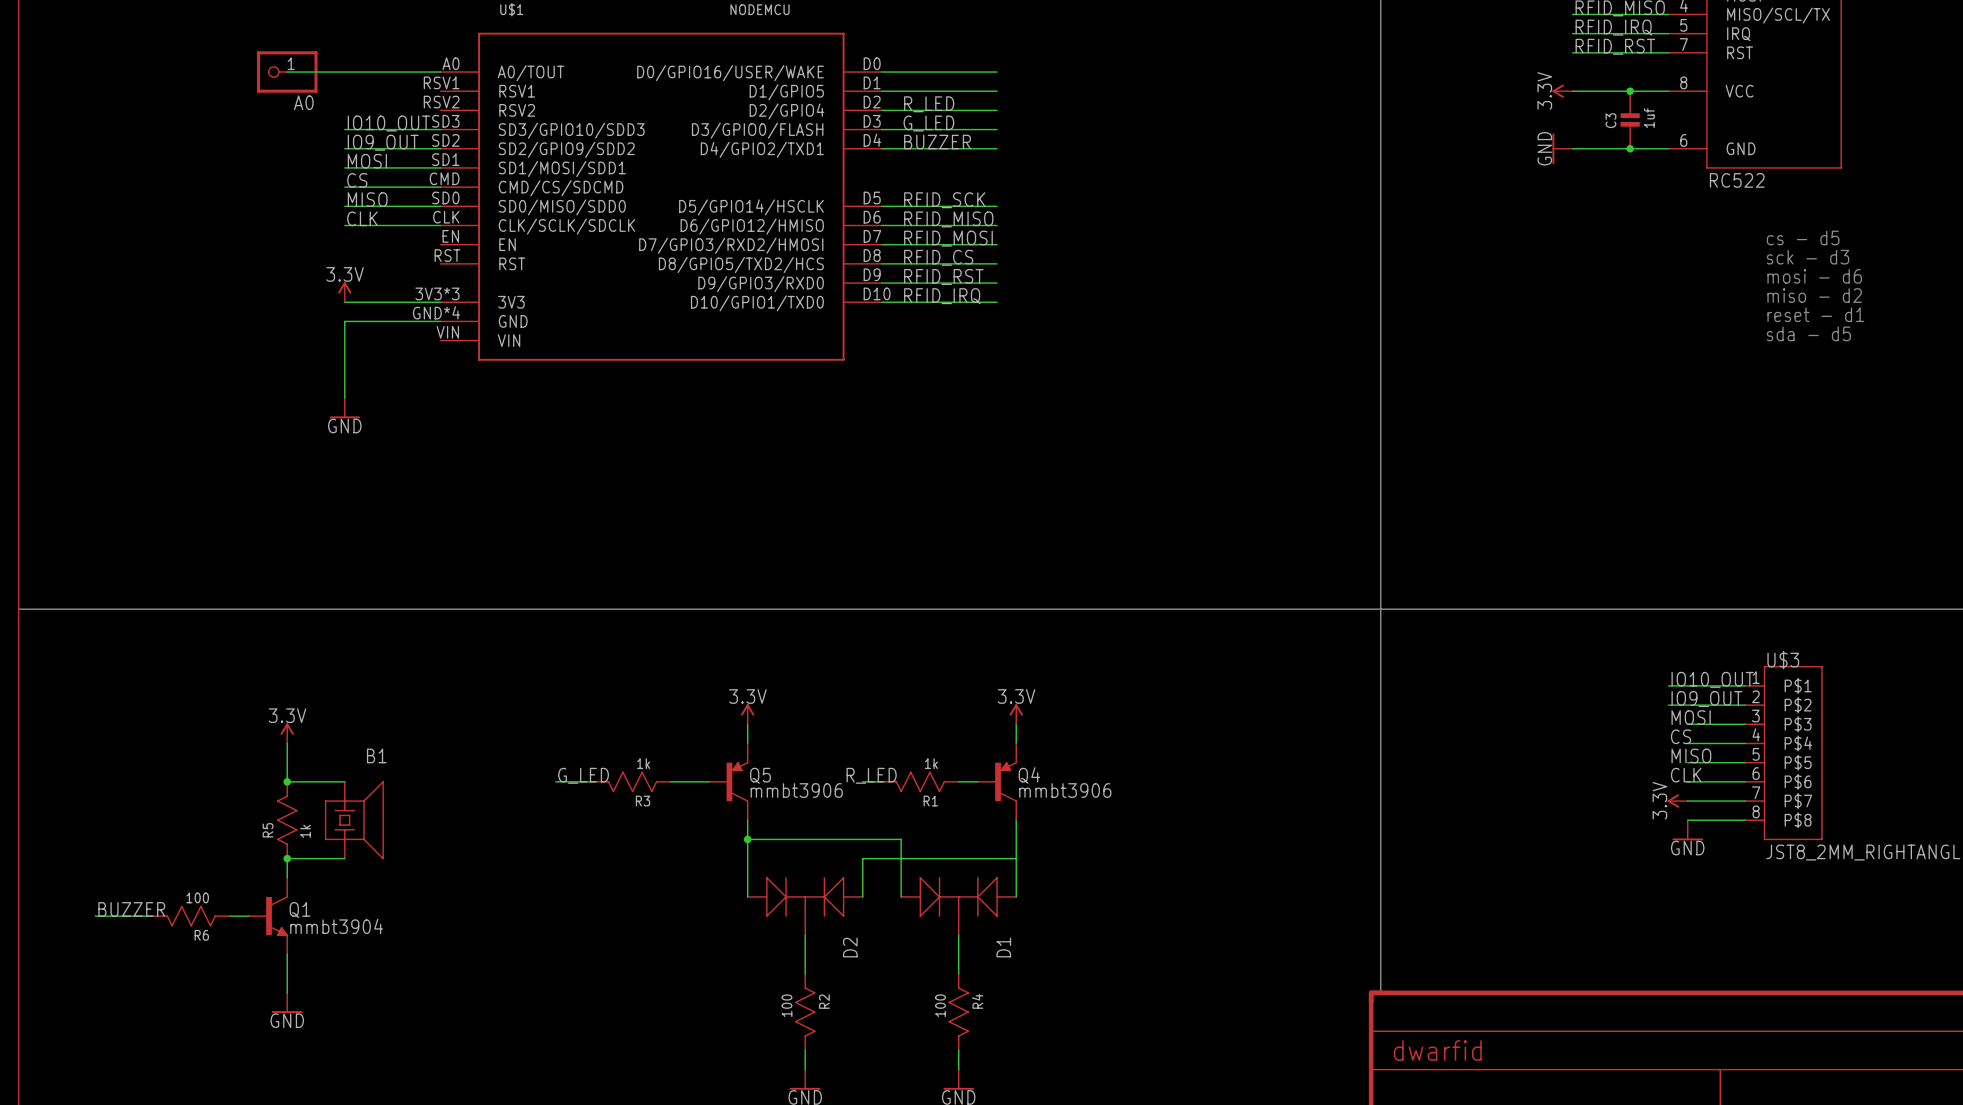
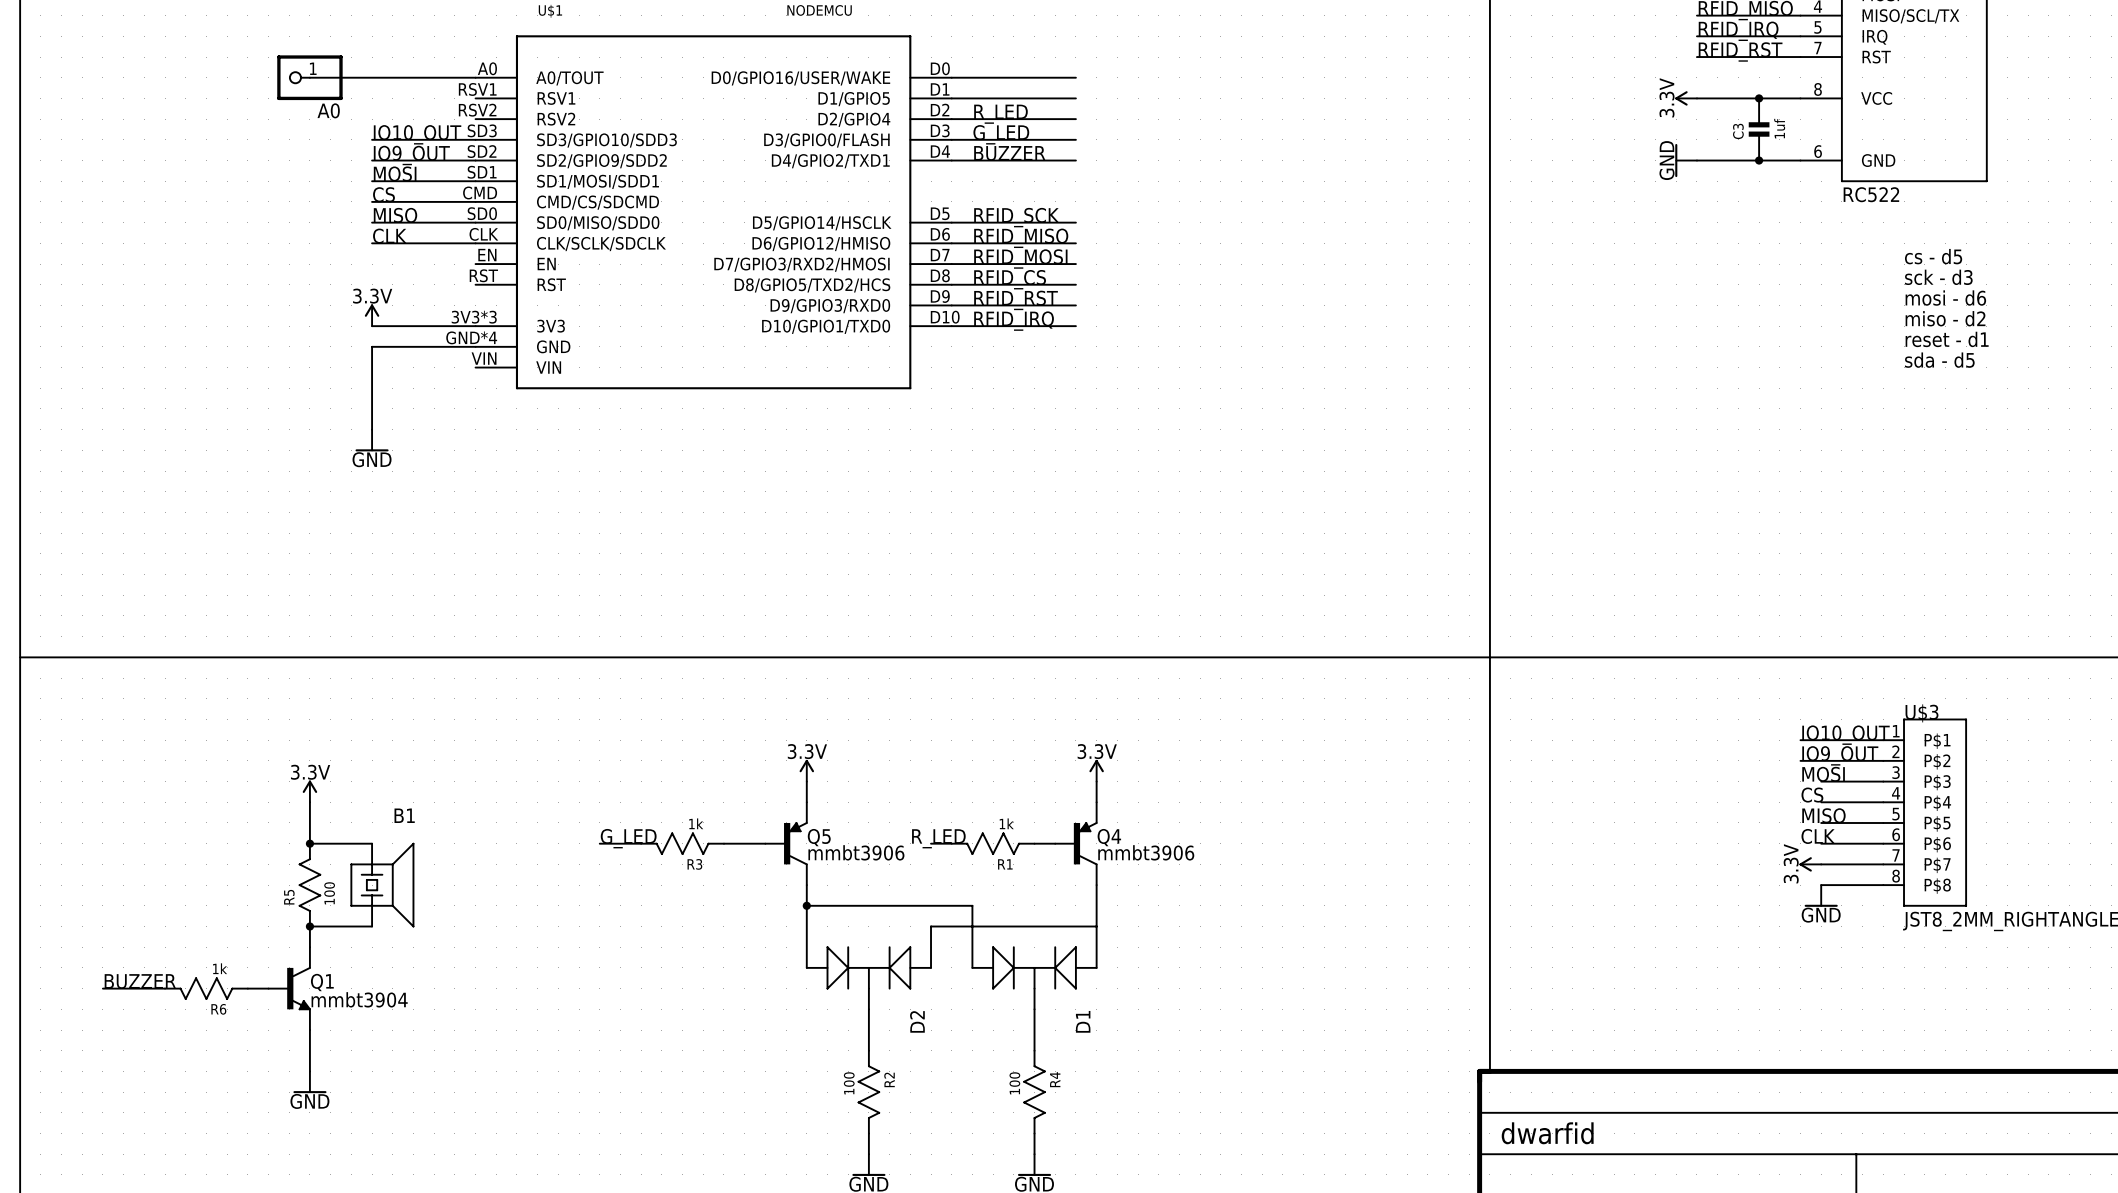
R5 value: 1k (305, 831) -> 100 (329, 893)
R6 value: 100 (197, 897) -> 1k (220, 968)

